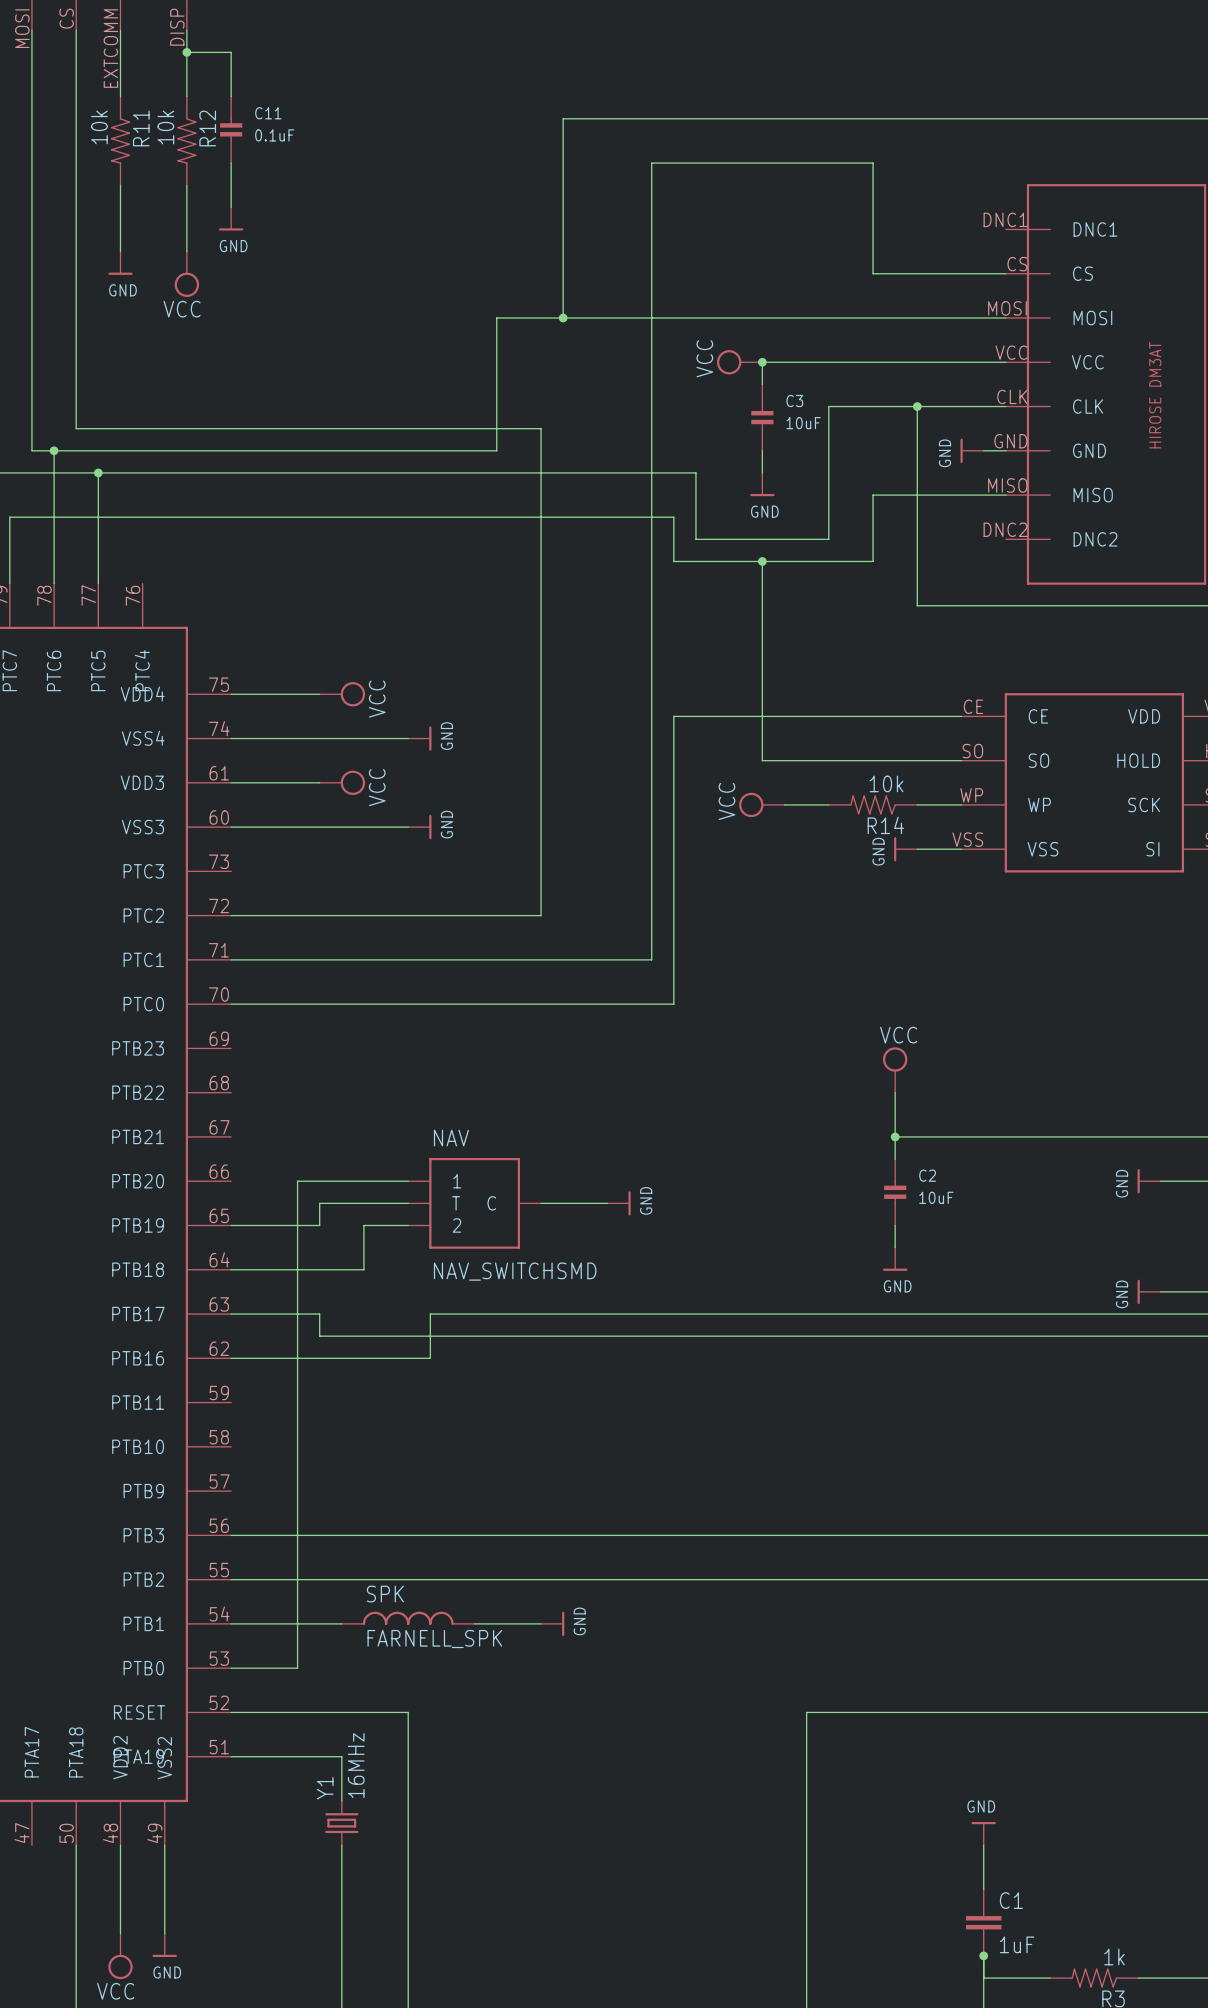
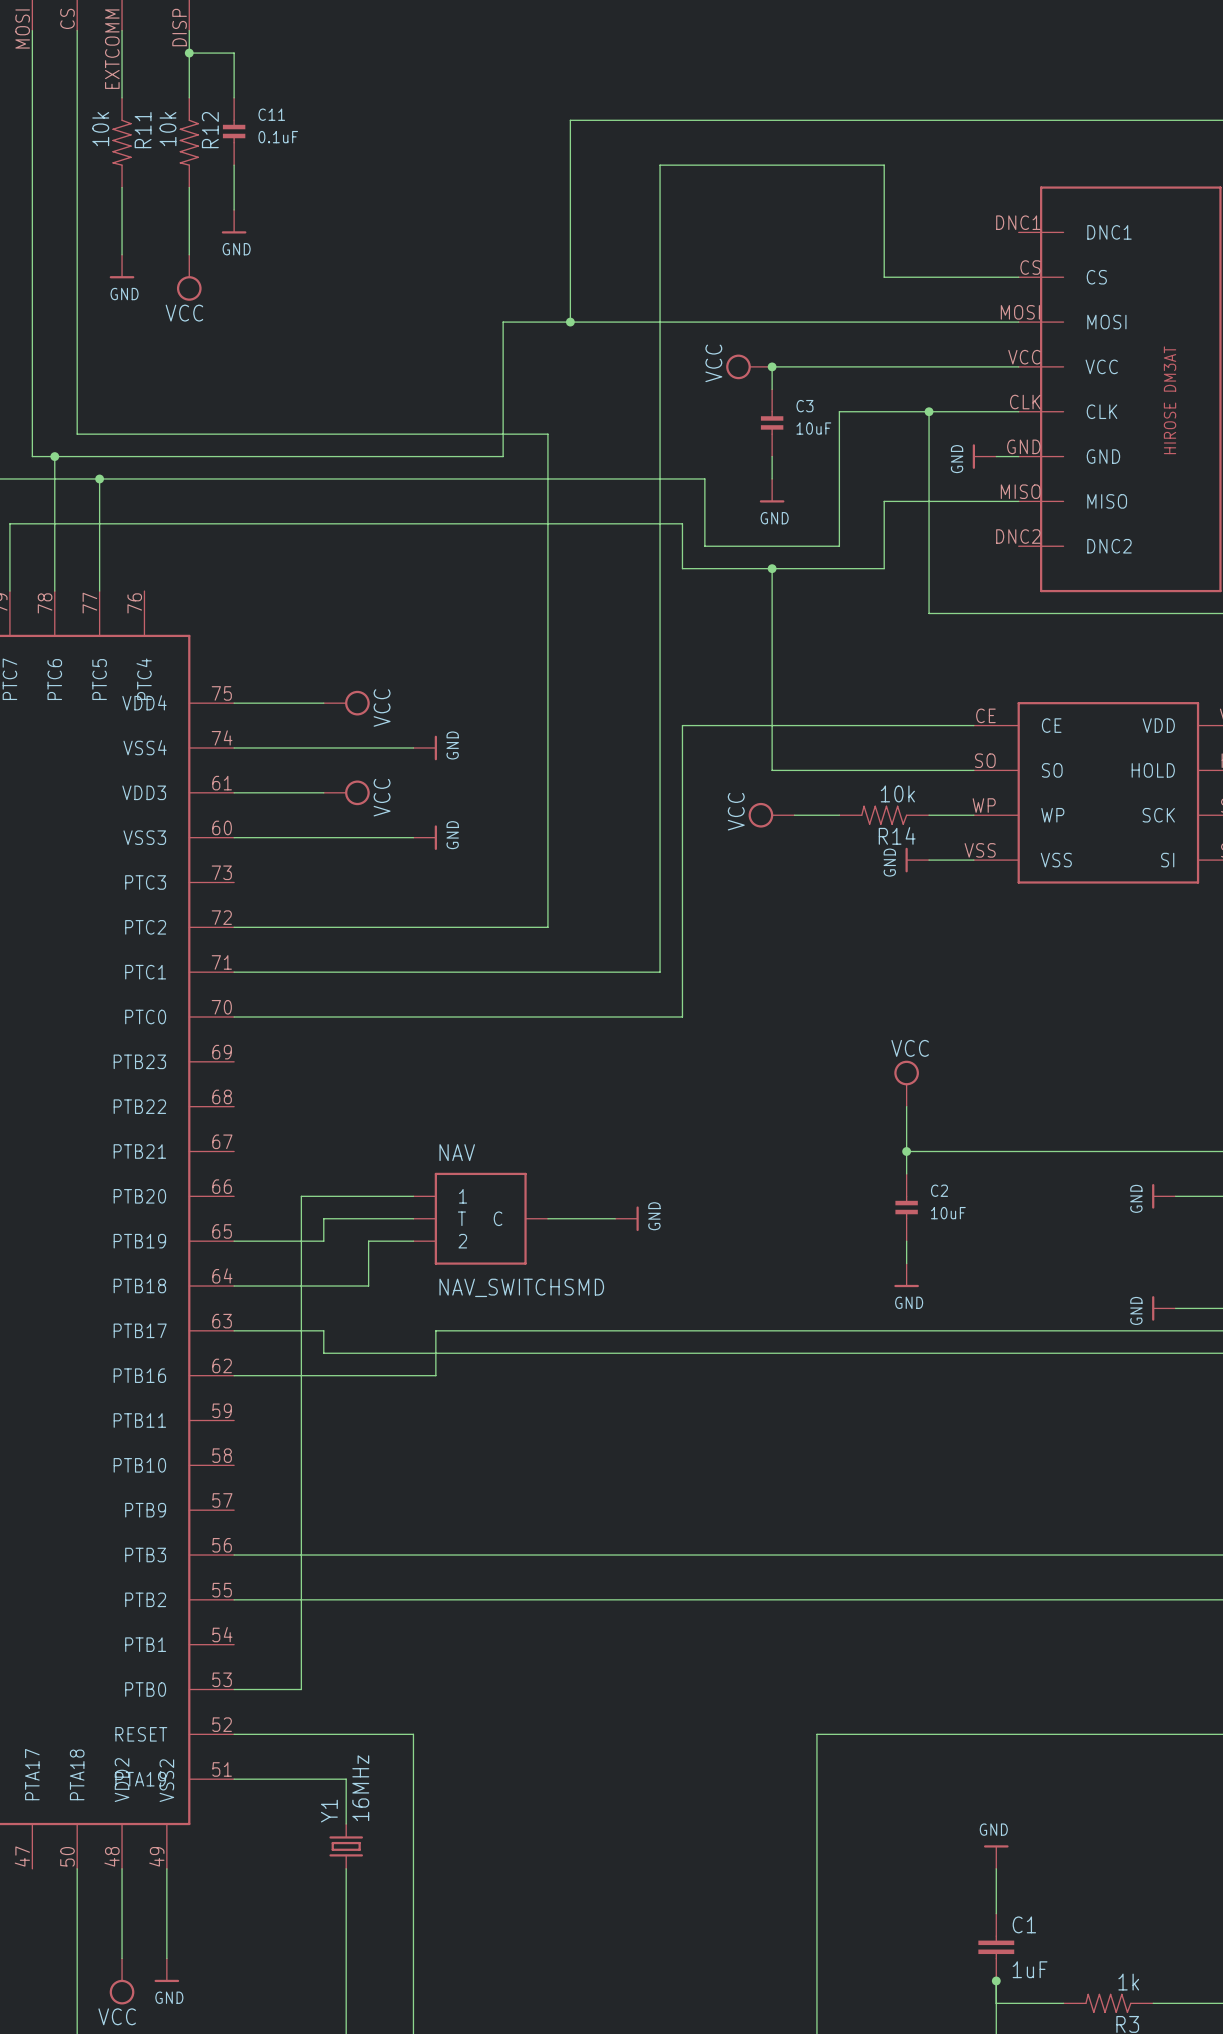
SPK: FARNELL_SPK (408, 1618) -> none
wire: (231, 1623) (341, 1623) -> none
wire: (474, 1623) (541, 1623) -> none
power symbol: GND (552, 1623) -> none

